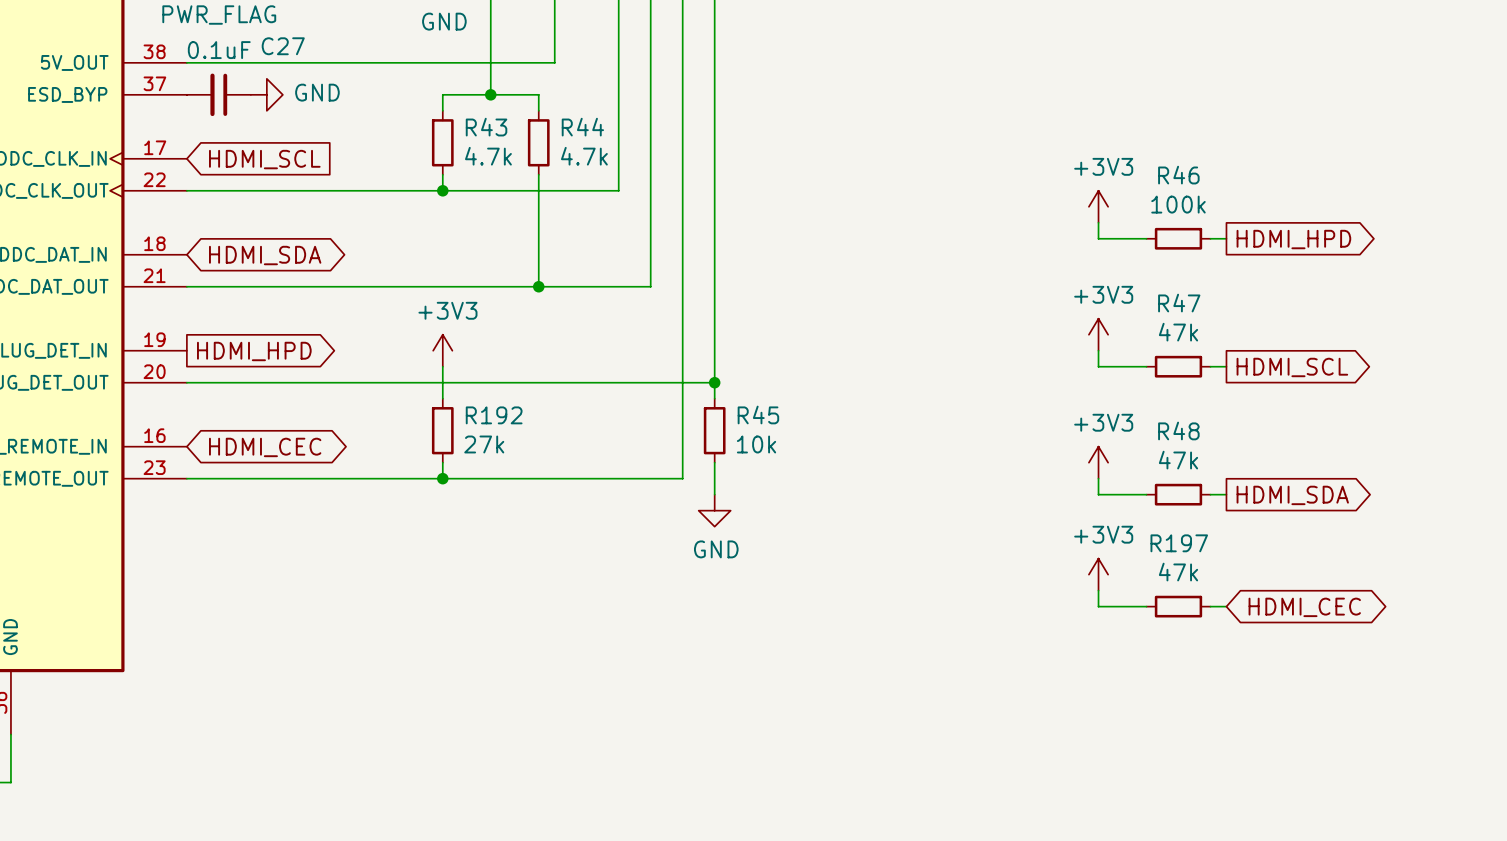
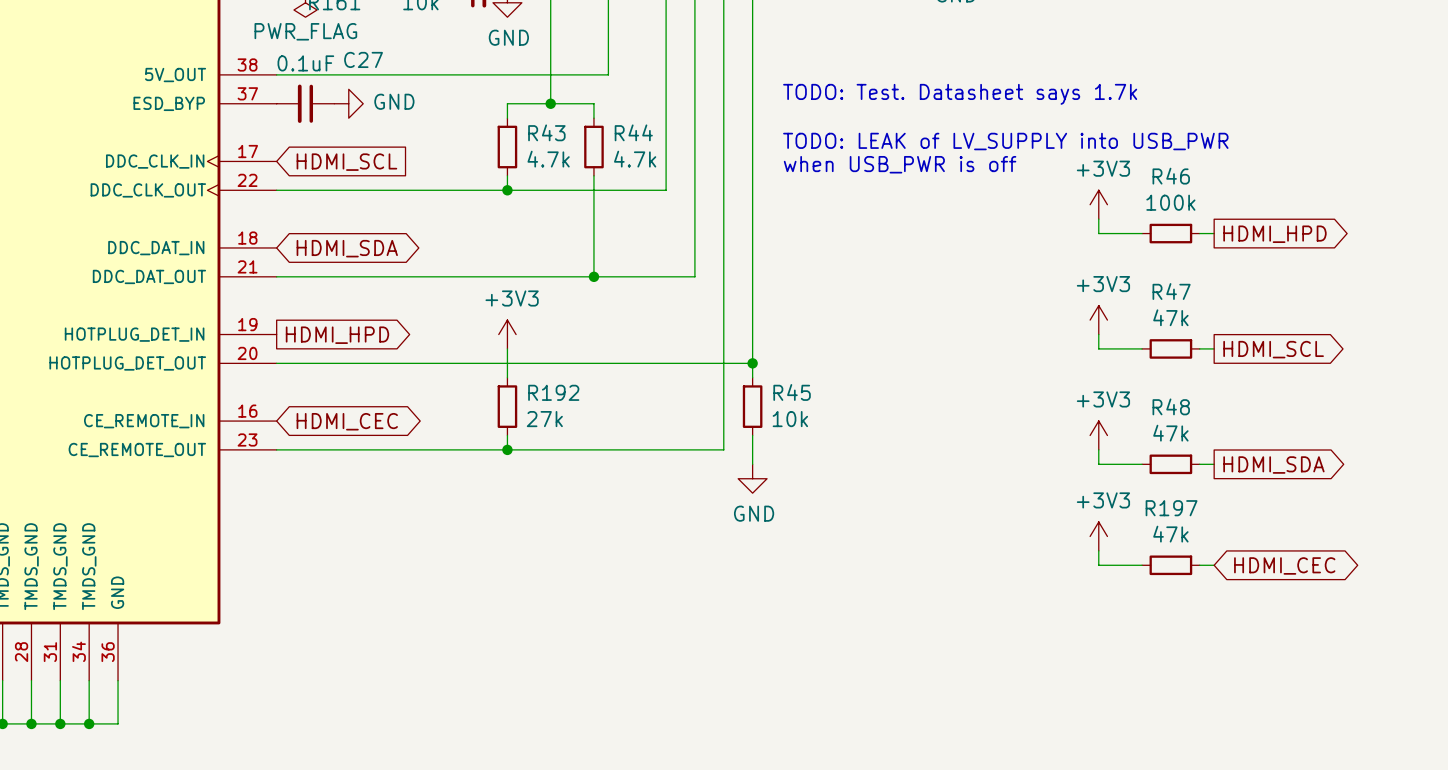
text: none -> TODO: Test. Datasheet says 1.7k (960, 94)
text: none -> TODO: LEAK of LV_SUPPLY into USB_PWR (1005, 141)
text: none -> when USB_PWR is off (900, 164)

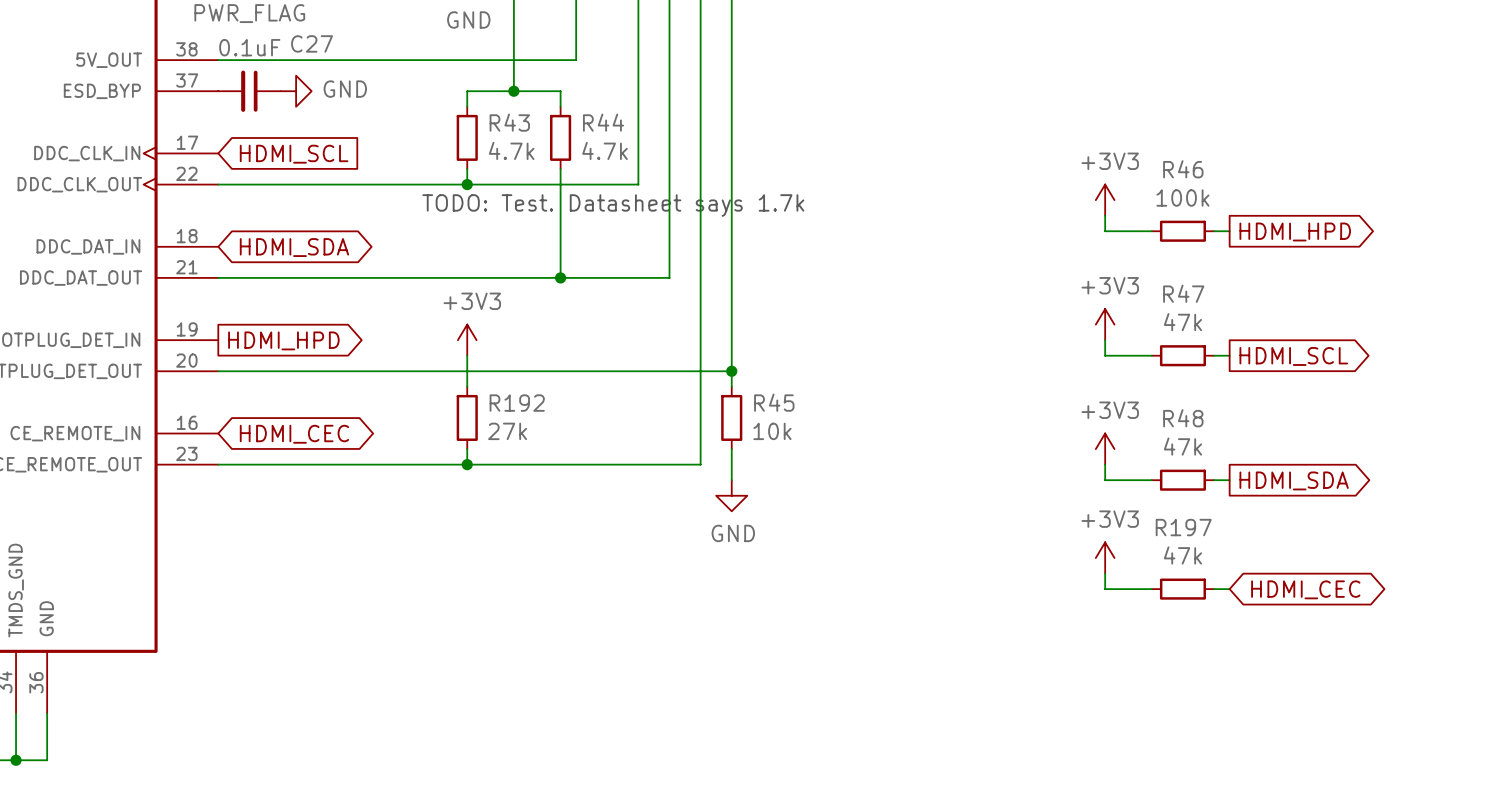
text: TODO: Test. Datasheet says 1.7k (960, 94) -> none
text: TODO: LEAK of LV_SUPPLY into USB_PWR (1005, 141) -> none
text: when USB_PWR is off (900, 164) -> none
text: none -> TODO: Test. Datasheet says 1.7k (613, 205)

